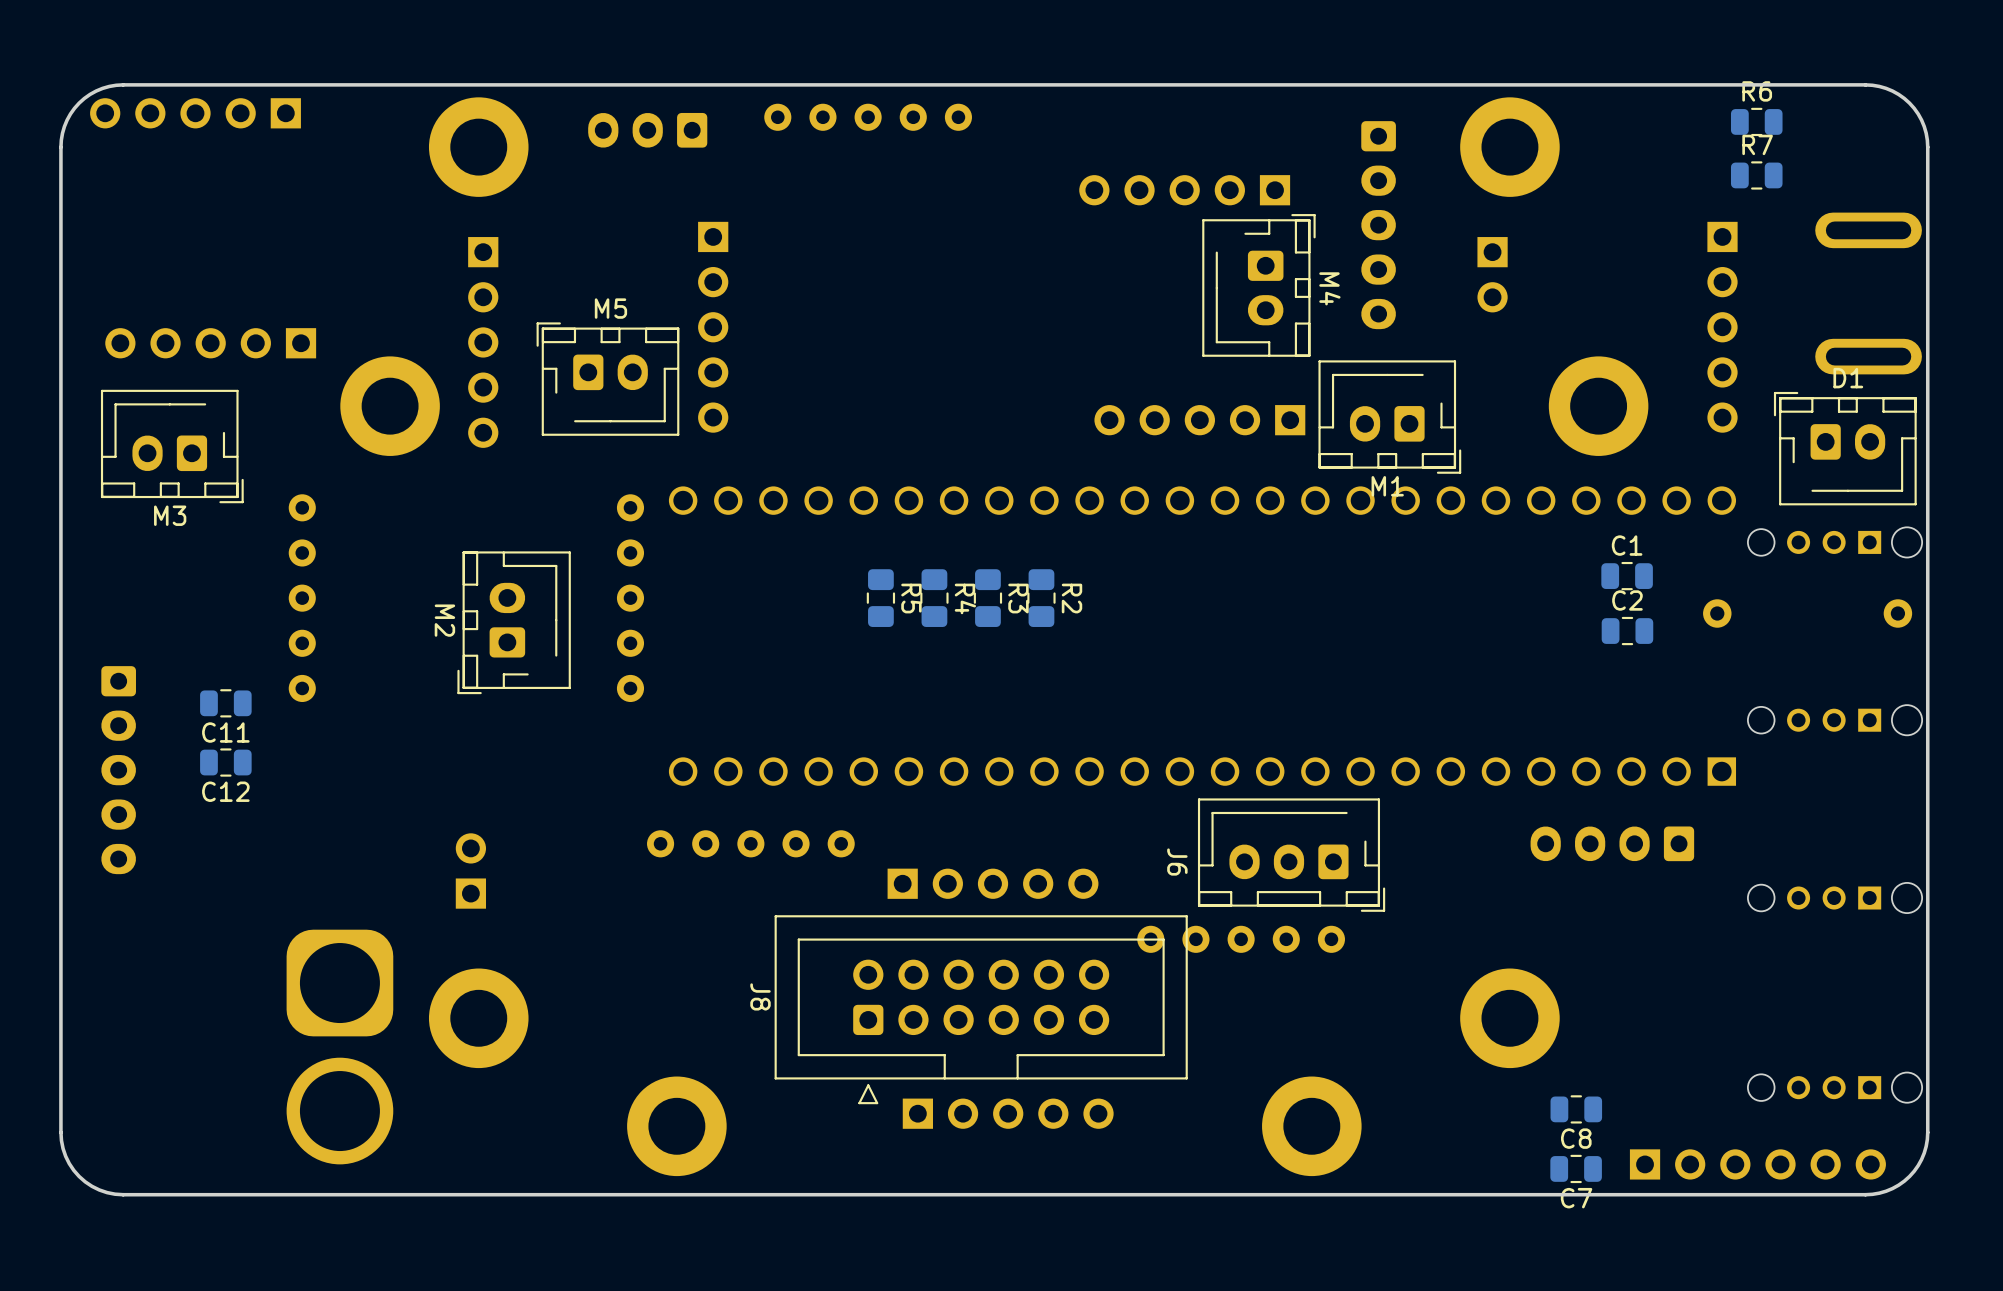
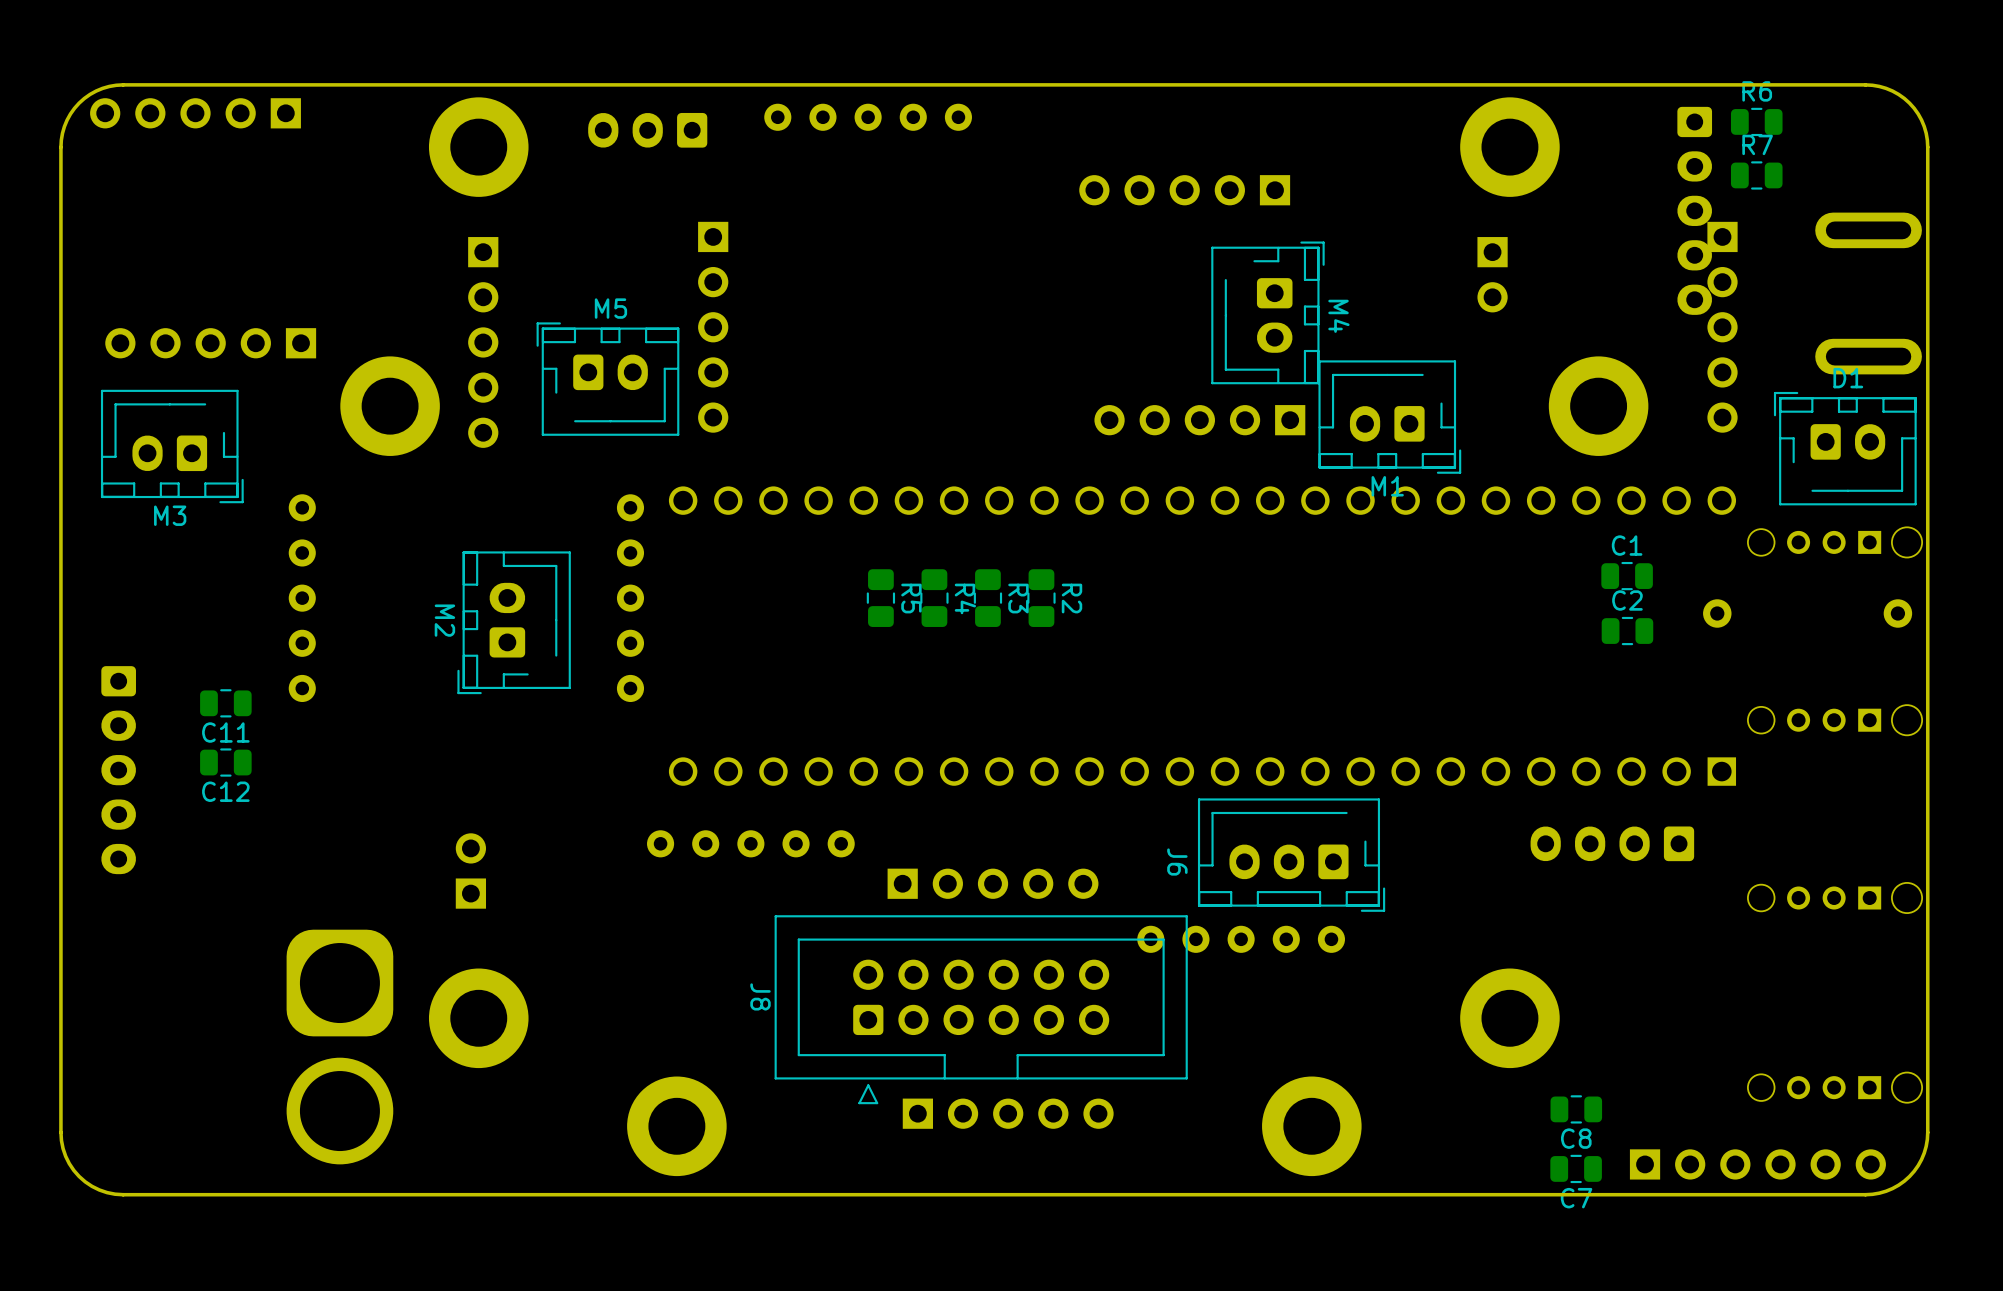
part position: (1378, 225) -> (1694, 210)
M4 position: (1258, 285) -> (1267, 312)

